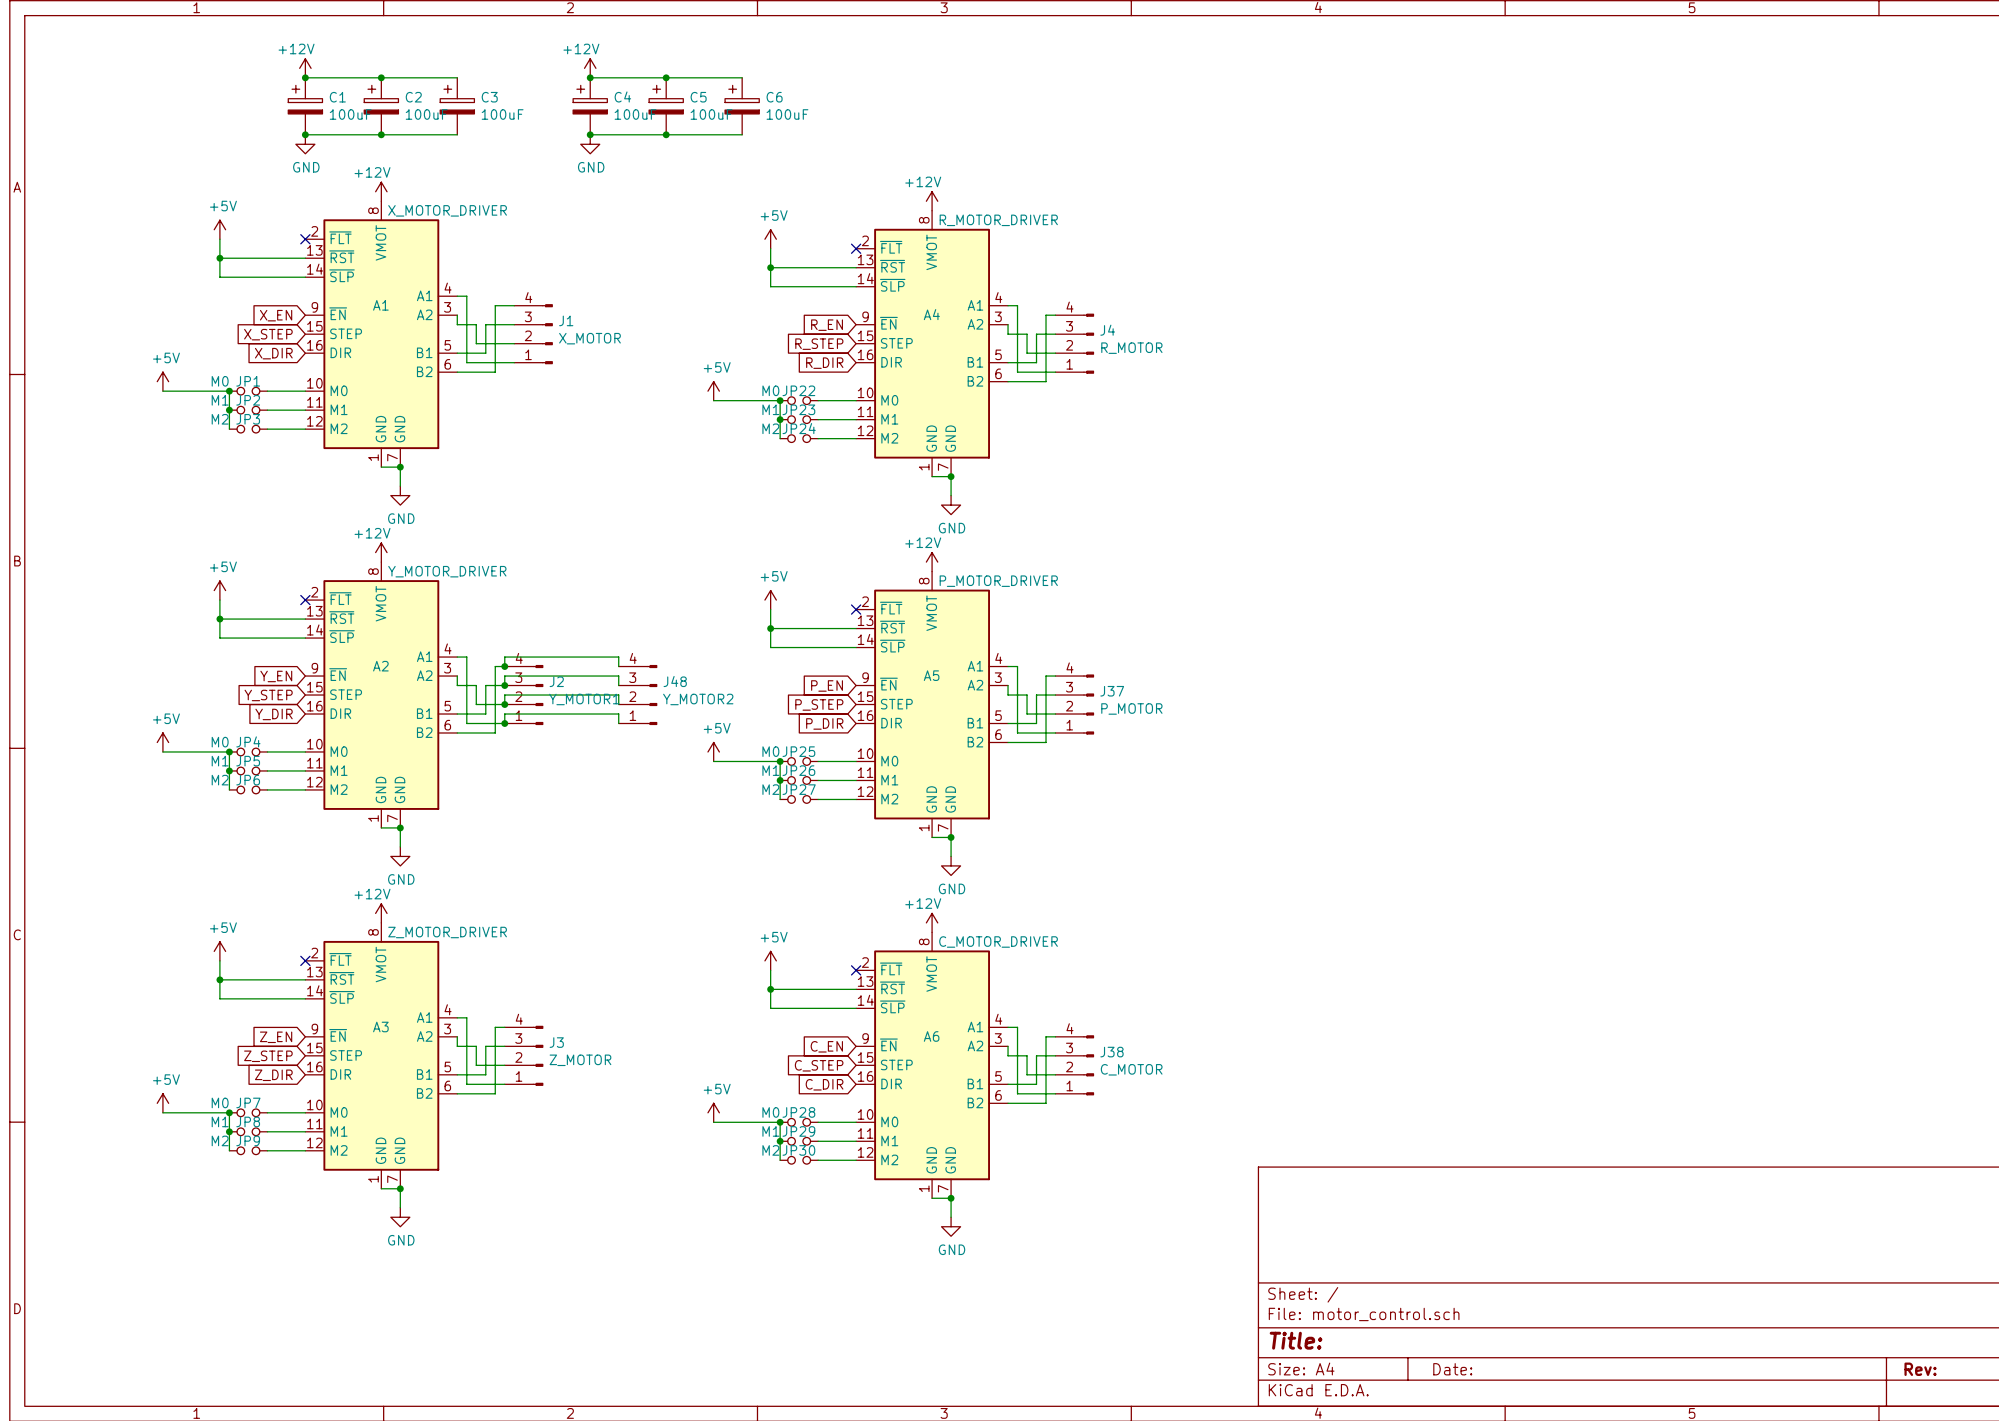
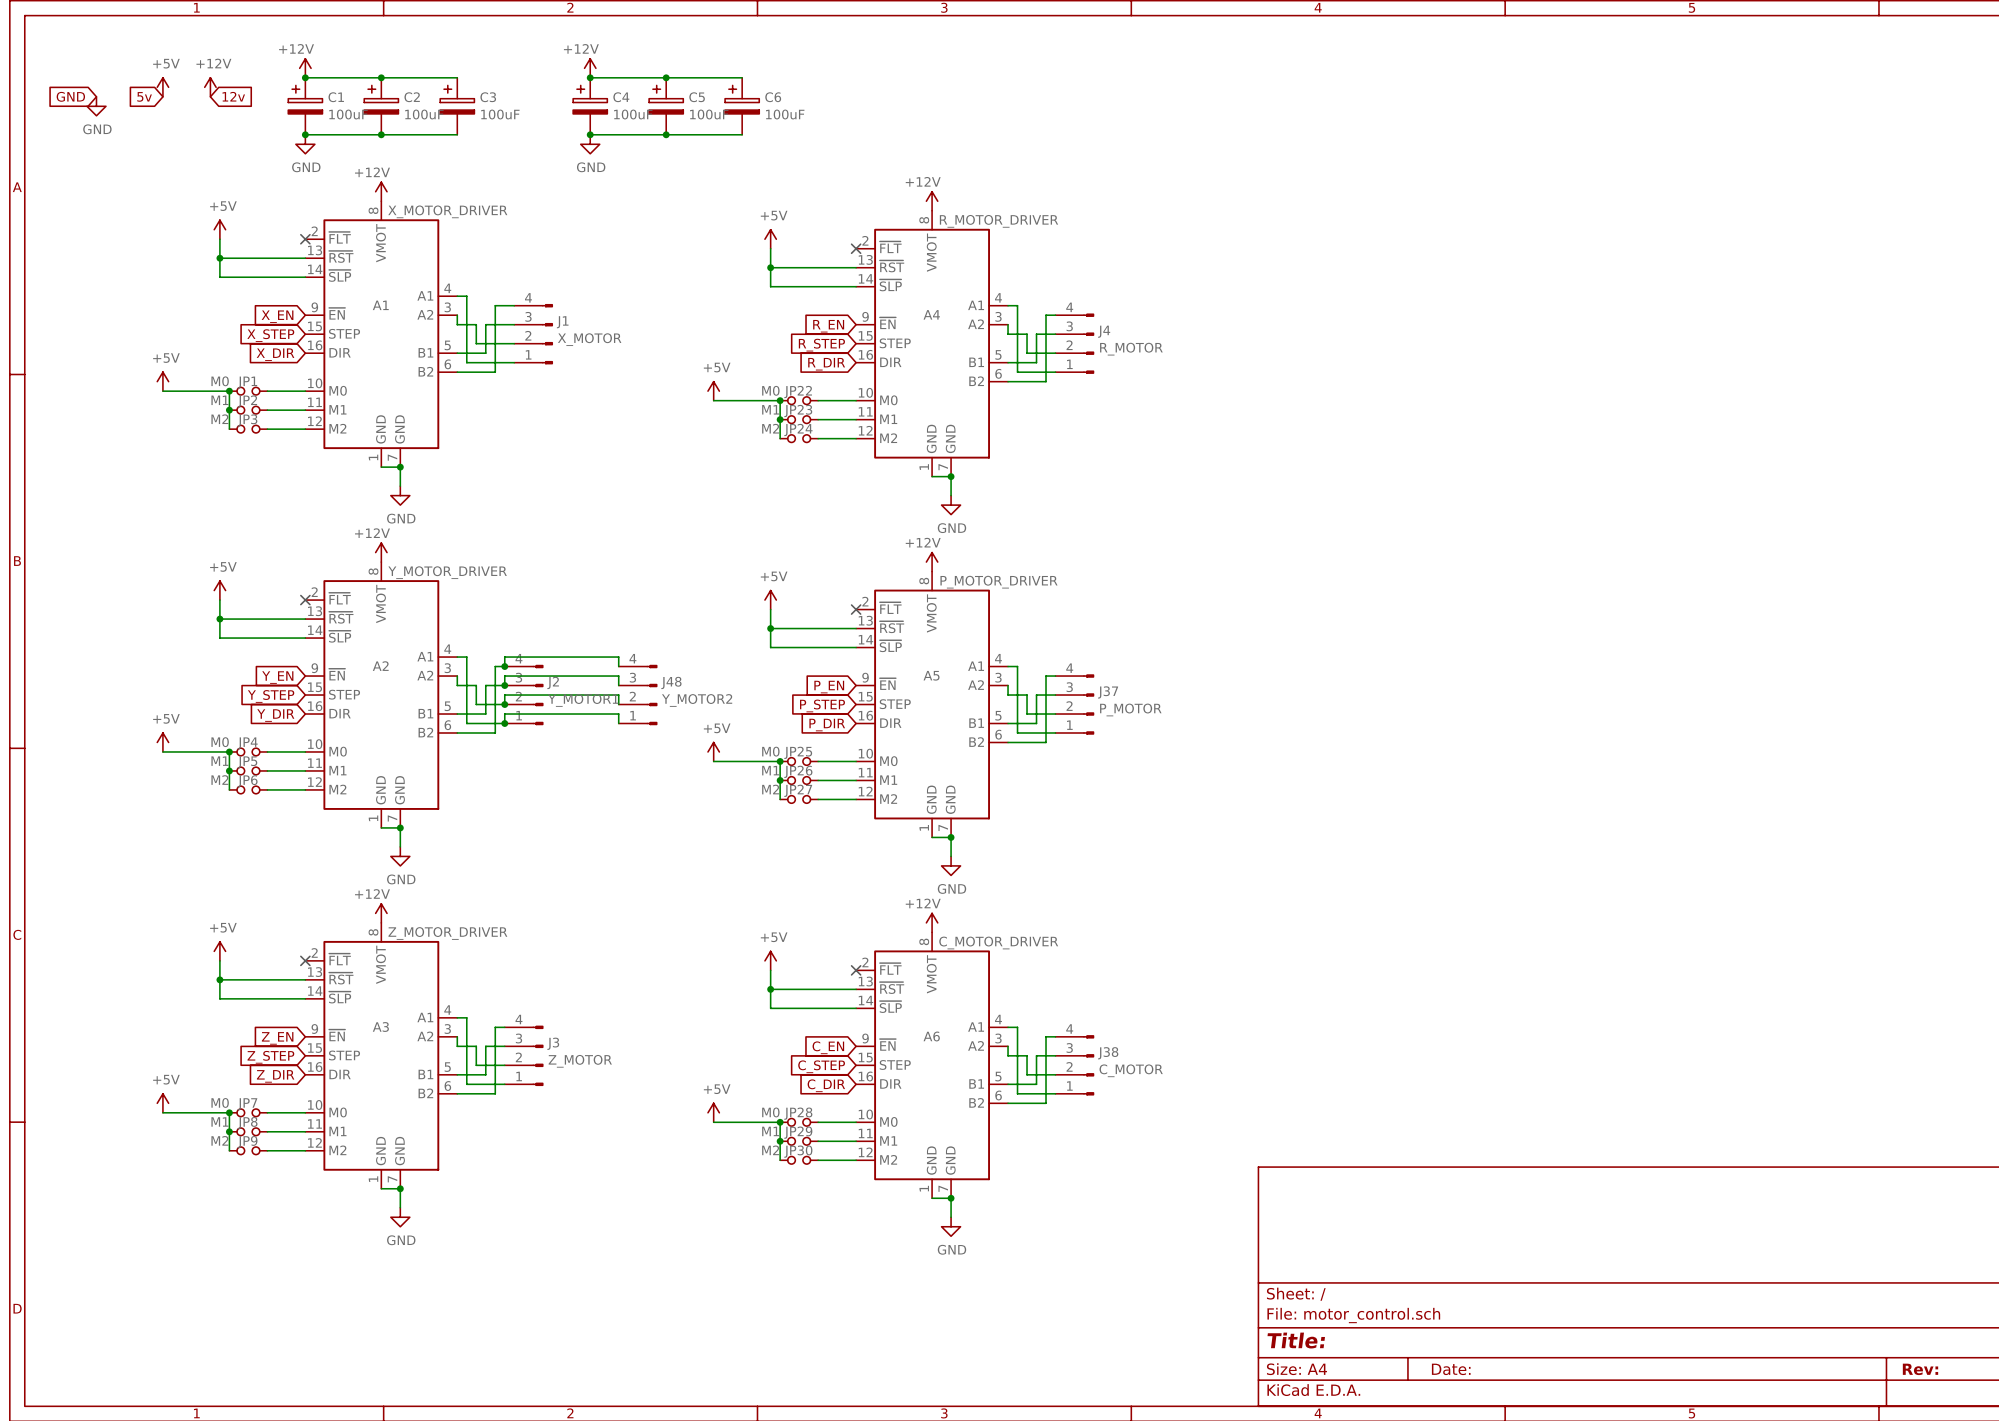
power symbol: none -> +5V (162, 87)
power symbol: none -> +12V (210, 87)
global label: none -> GND (70, 96)
global label: none -> 5v (144, 96)
global label: none -> 12v (233, 96)
power symbol: none -> GND (96, 106)

